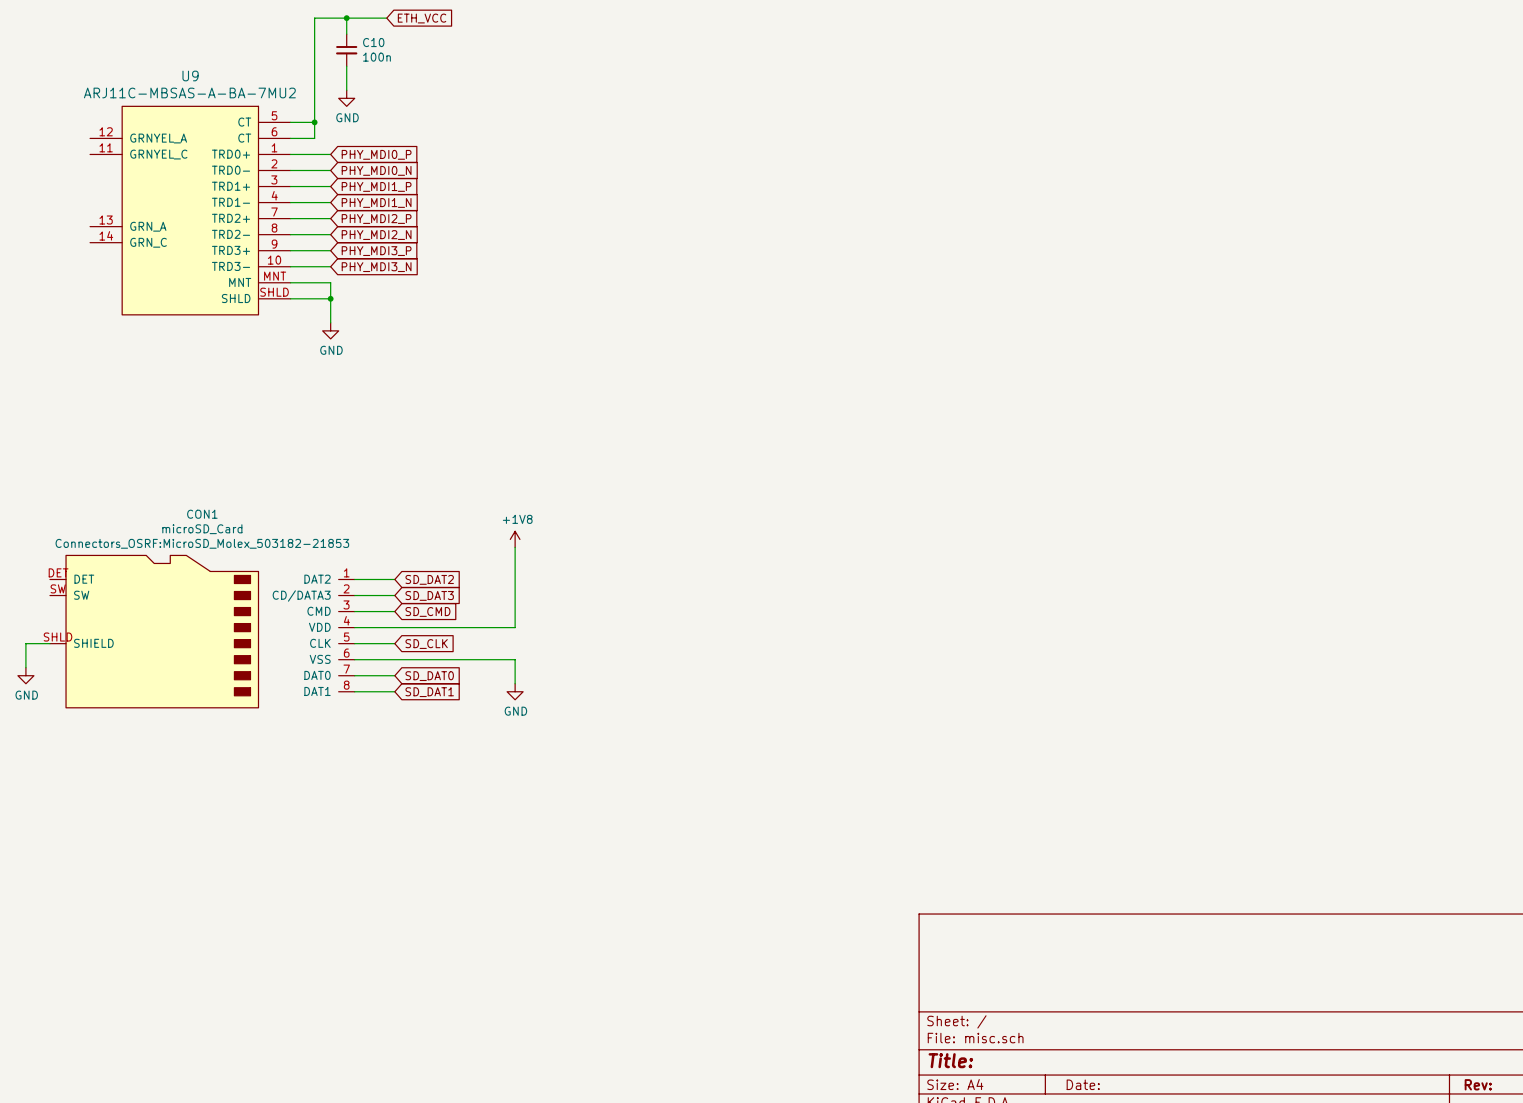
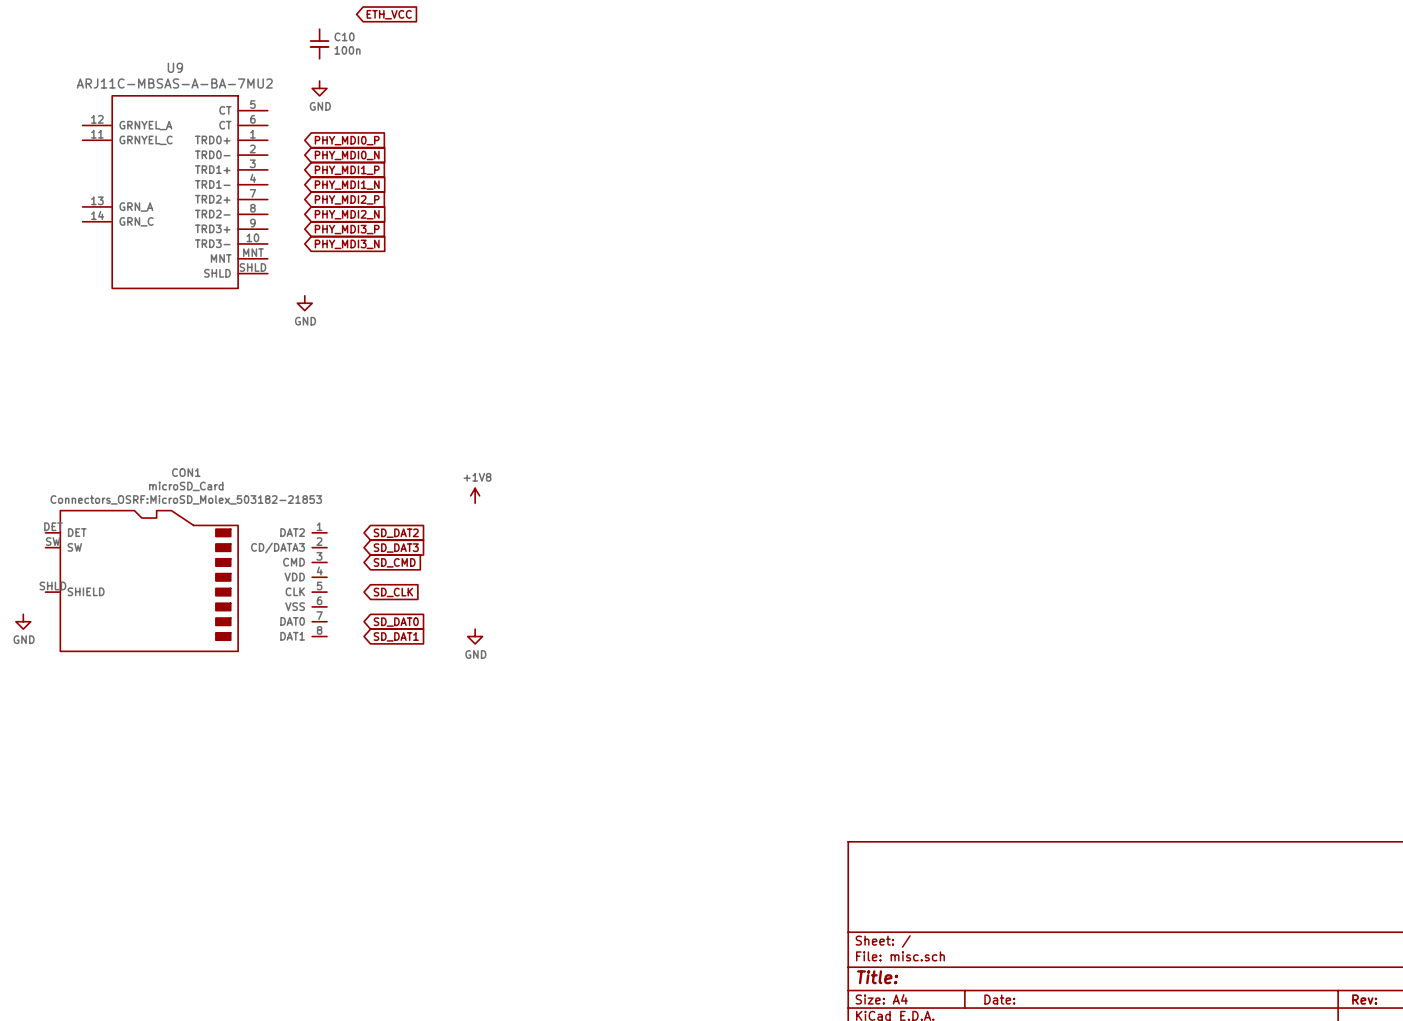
wire: (346, 18) (346, 34) -> none
junction: (346, 18) -> none
wire: (386, 18) (314, 18) (314, 138) (290, 138) -> none
wire: (346, 66) (346, 90) -> none
wire: (290, 122) (314, 122) -> none
junction: (314, 122) -> none
wire: (290, 154) (330, 154) -> none
wire: (290, 170) (330, 170) -> none
wire: (290, 186) (330, 186) -> none
wire: (290, 202) (330, 202) -> none
wire: (290, 218) (330, 218) -> none
wire: (290, 234) (330, 234) -> none
wire: (290, 250) (330, 250) -> none
wire: (290, 266) (330, 266) -> none
wire: (290, 282) (330, 282) (330, 322) -> none
wire: (290, 298) (330, 298) -> none
junction: (330, 298) -> none
wire: (515, 547) (515, 627) (354, 627) -> none
wire: (354, 579) (394, 579) -> none
wire: (354, 595) (394, 595) -> none
wire: (354, 611) (394, 611) -> none
wire: (49, 643) (25, 643) (25, 667) -> none
wire: (354, 643) (394, 643) -> none
wire: (354, 659) (515, 659) (515, 683) -> none
wire: (354, 675) (394, 675) -> none
wire: (354, 691) (394, 691) -> none

